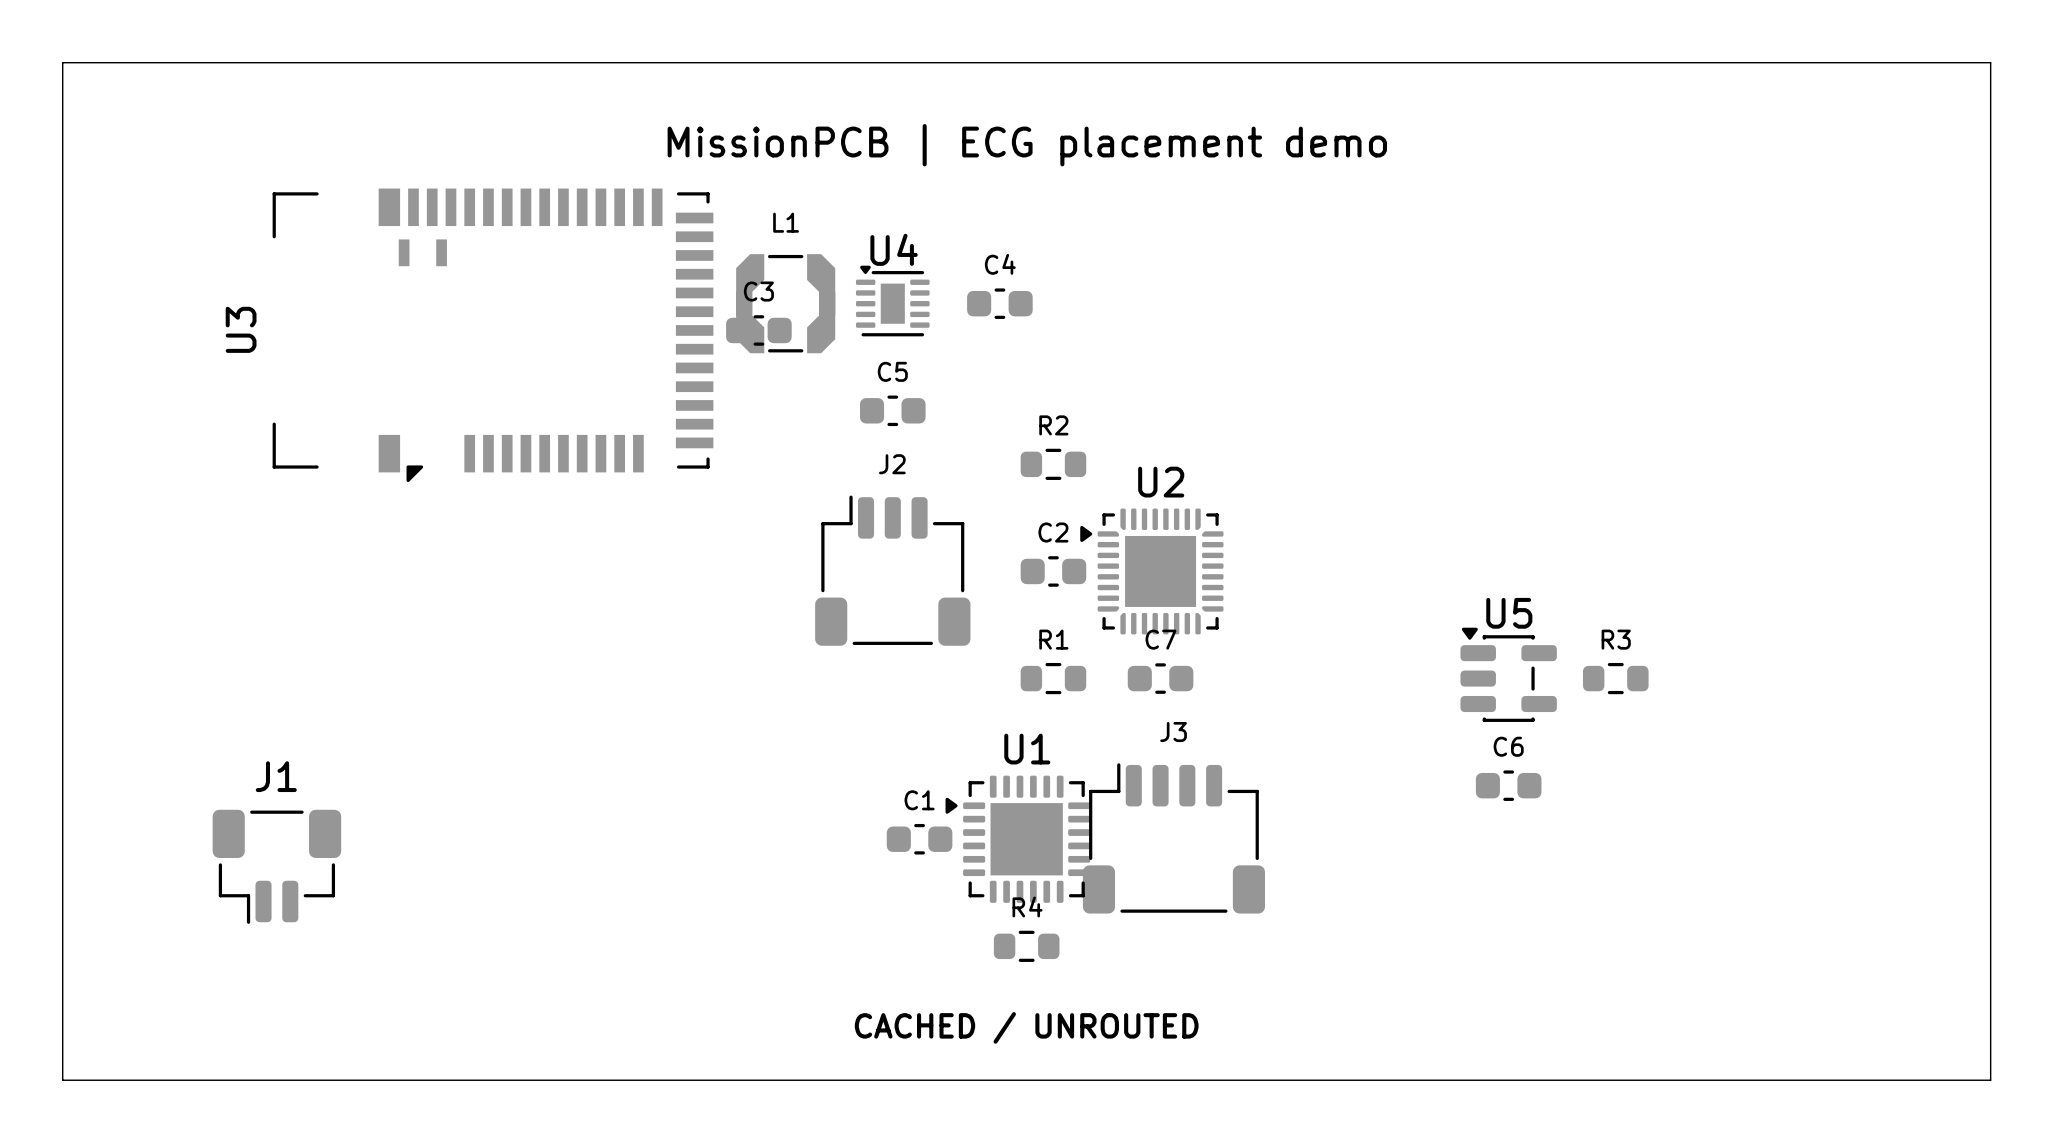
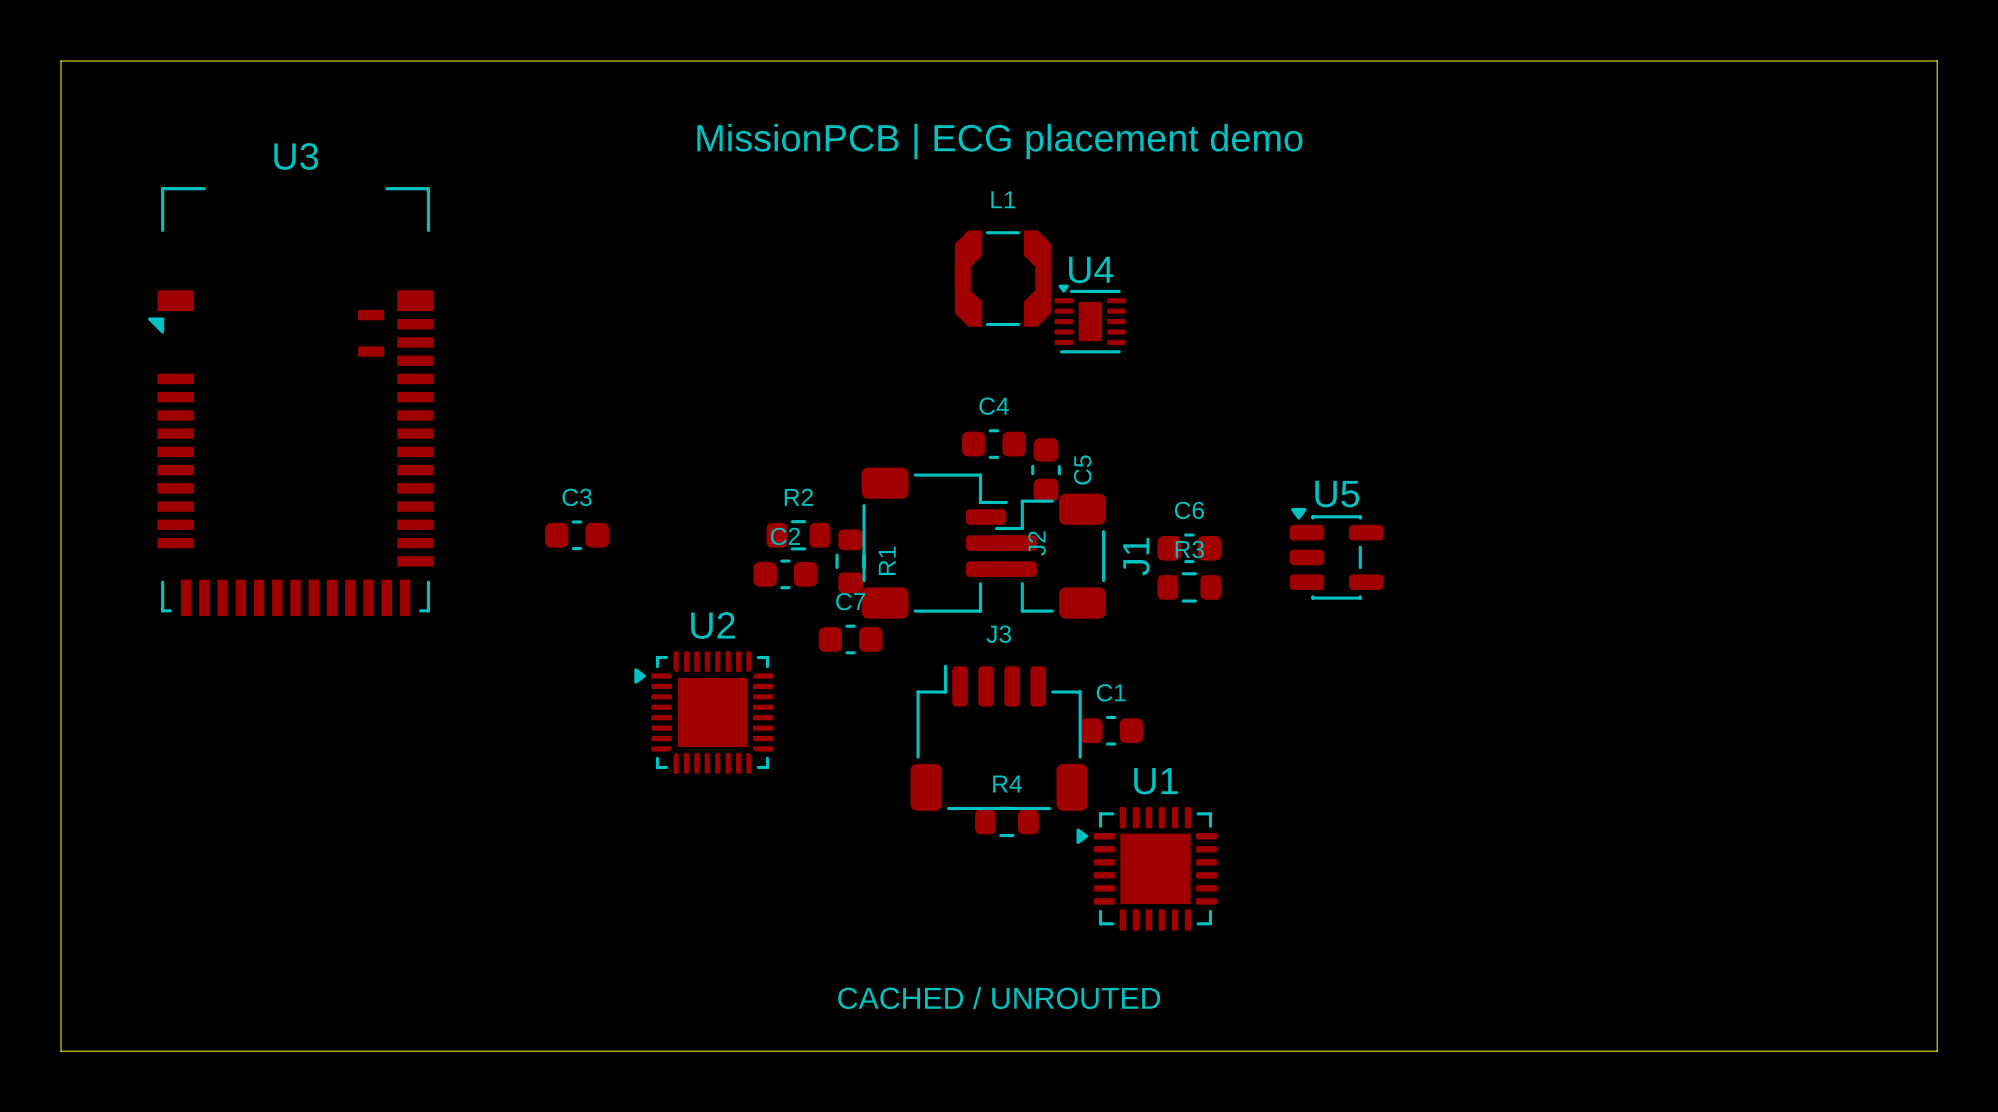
U4 position: (892, 301) -> (1090, 318)
L1 position: (785, 303) -> (1003, 278)
C4 position: (999, 303) -> (993, 444)
C3 position: (758, 330) -> (576, 535)
U3 rotation: 0° (493, 335) -> 90° clockwise (290, 401)
C5 rotation: 0° (892, 410) -> 90° clockwise (1046, 470)
C5 position: (892, 410) -> (1046, 470)
R2 position: (1053, 464) -> (798, 535)
J2 rotation: 0° (892, 570) -> 90° clockwise (934, 543)
C2 position: (1053, 571) -> (785, 574)
U2 position: (1151, 571) -> (704, 712)
U5 position: (1508, 674) -> (1336, 553)
R1 rotation: 0° (1053, 678) -> 90° clockwise (850, 561)
R1 position: (1053, 678) -> (850, 561)
C7 position: (1160, 678) -> (850, 639)
R3 position: (1615, 678) -> (1189, 587)
C6 position: (1508, 785) -> (1189, 548)
J3 position: (1173, 838) -> (999, 737)
C1 position: (919, 839) -> (1111, 730)
U1 position: (1017, 839) -> (1146, 868)
J1 rotation: 0° (276, 866) -> 90° clockwise (1050, 556)
J1 position: (276, 866) -> (1050, 556)
R4 position: (1026, 946) -> (1006, 821)

